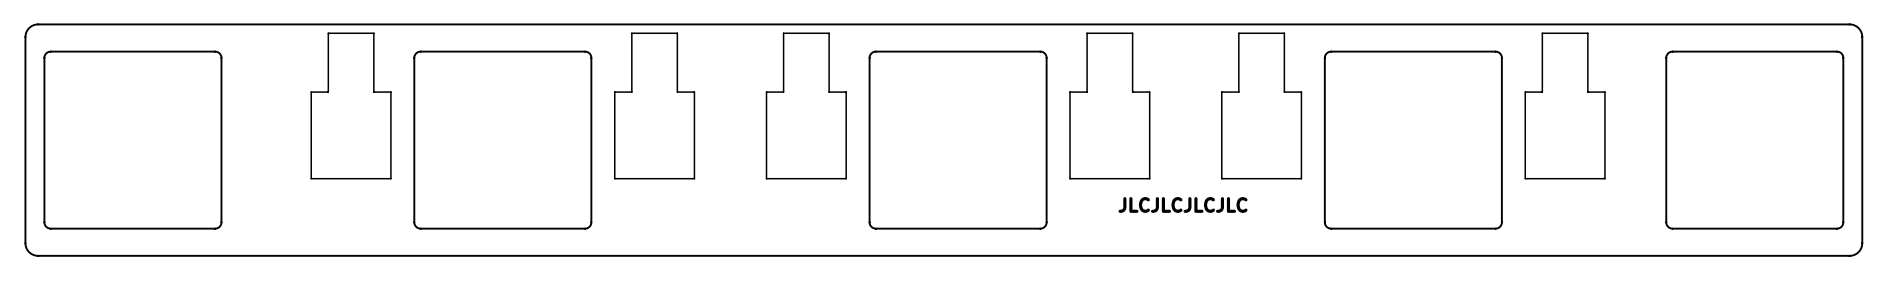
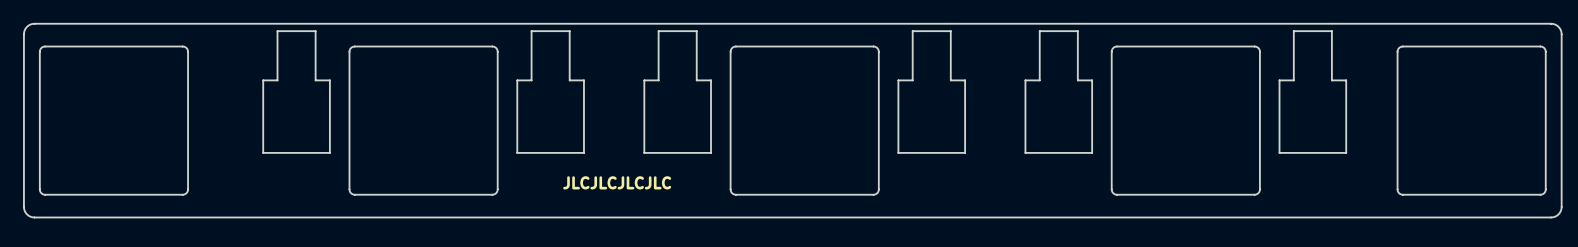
text: JLCJLCJLCJLC (1182, 204) -> none
text: none -> JLCJLCJLCJLC (617, 182)

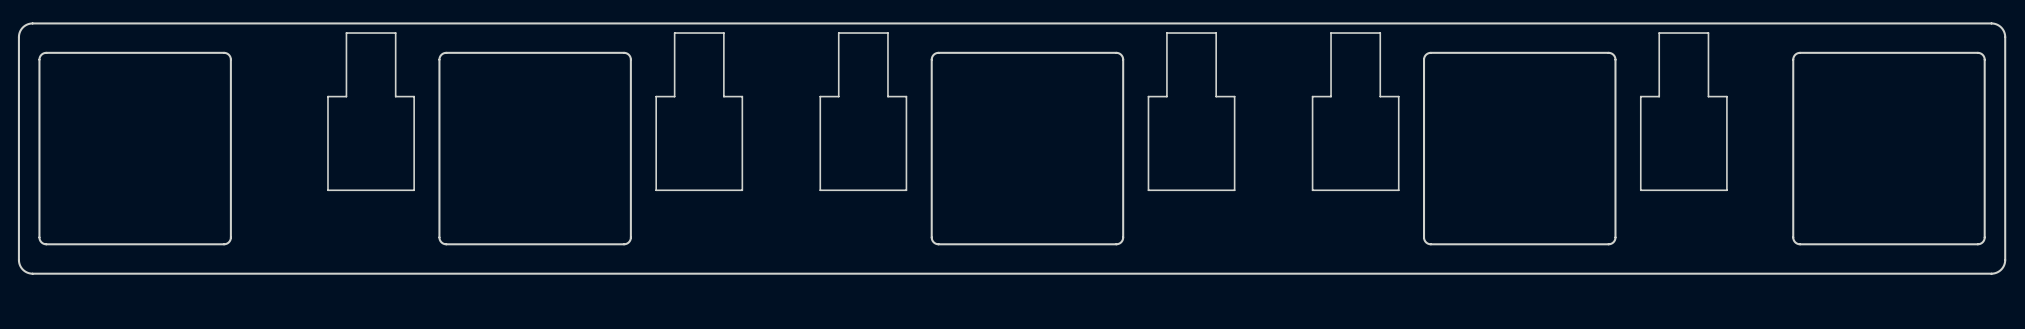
text: JLCJLCJLCJLC (617, 182) -> none

